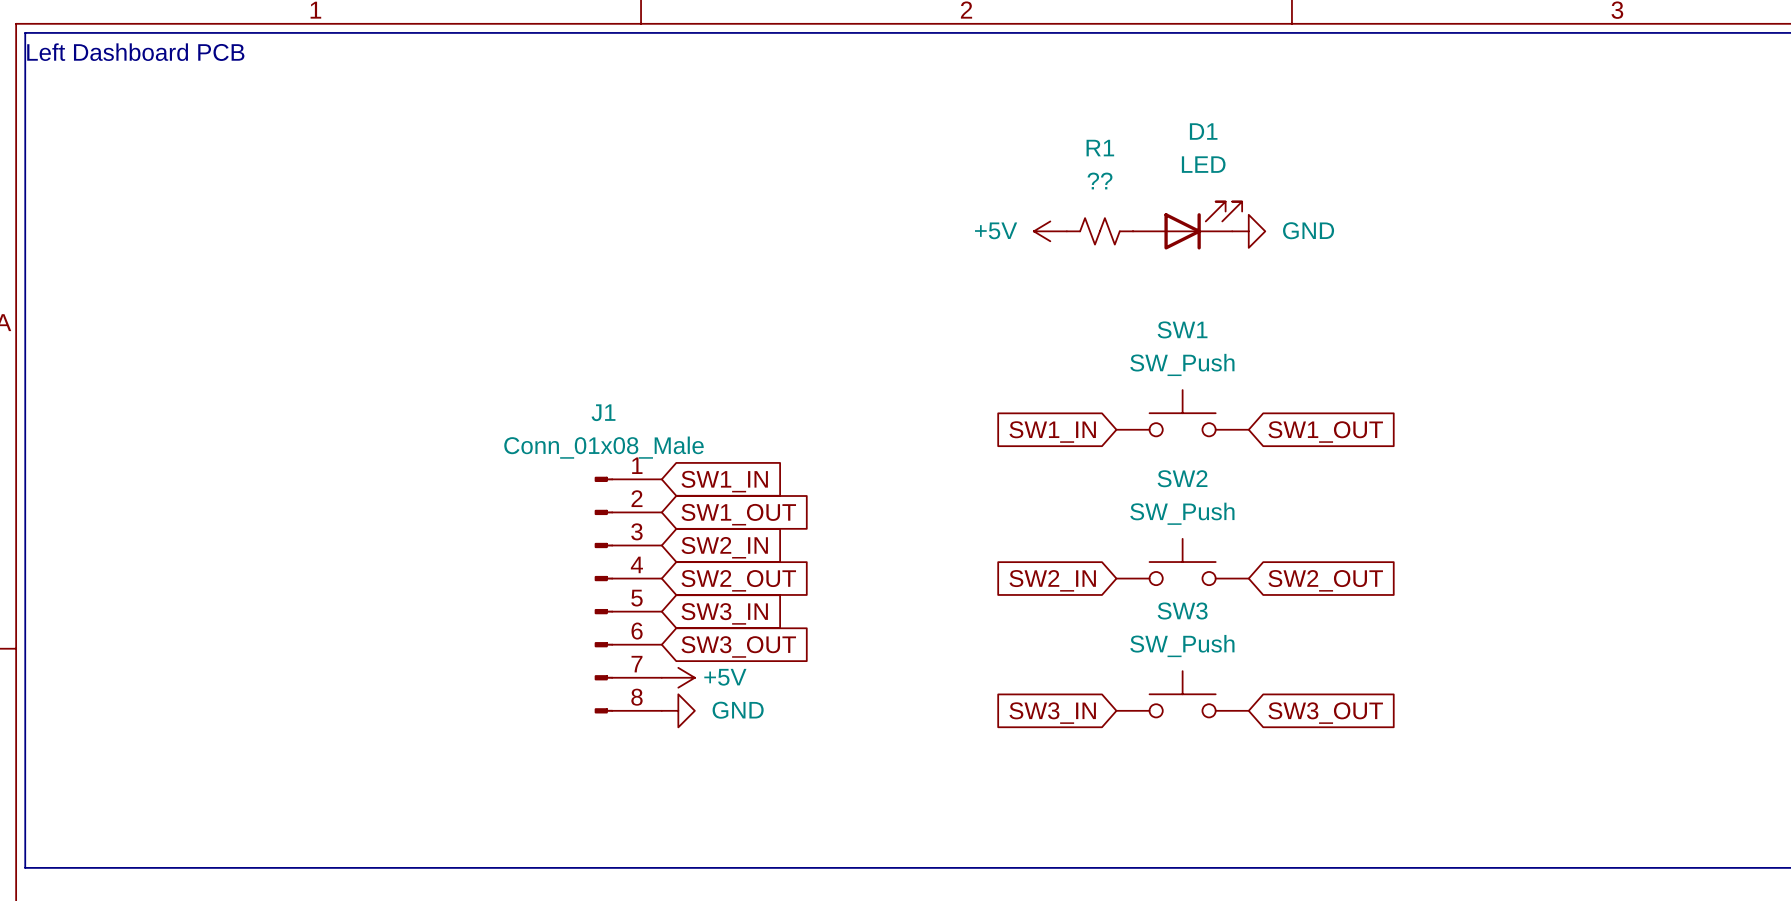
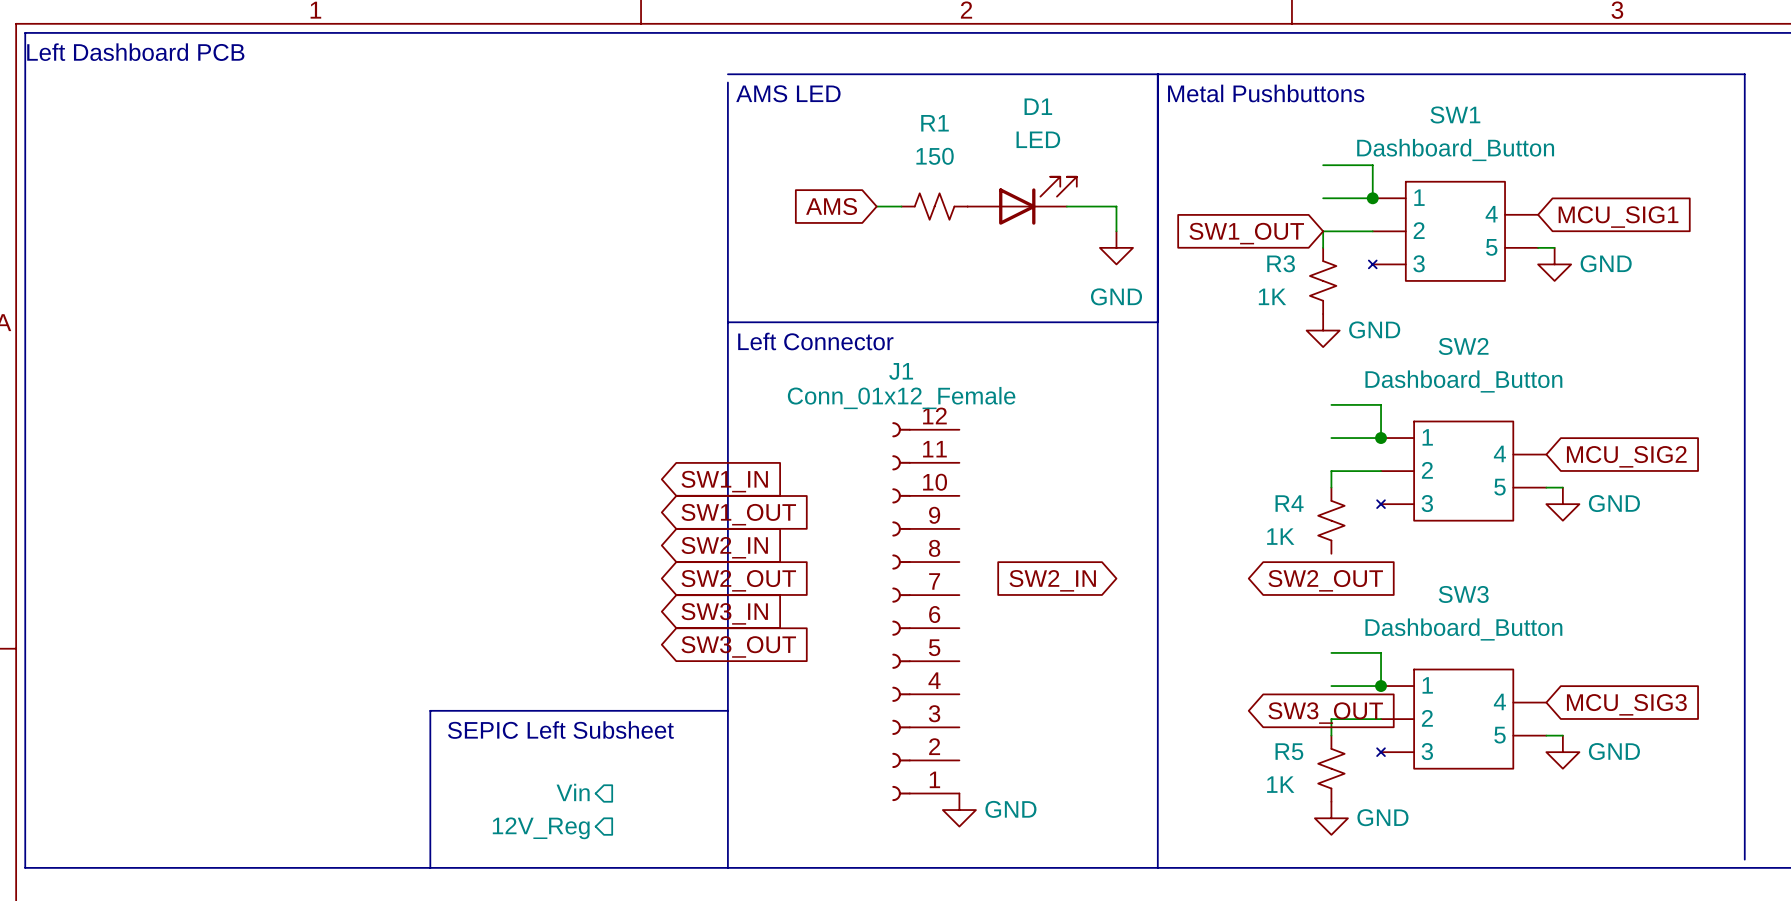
line: none -> (727, 74) (1744, 74) (1744, 859)
line: none -> (1157, 74) (1157, 867)
line: none -> (727, 82) (727, 867)
text: none -> AMS LED (788, 93)
text: none -> Metal Pushbuttons (1266, 93)
wire: none -> (1323, 165) (1372, 165) (1372, 198) (1323, 198)
R1 value: ?? (1099, 181) -> 150 (935, 156)
junction: none -> (1372, 198)
global label: none -> AMS (831, 206)
wire: none -> (876, 206) (901, 206)
wire: none -> (1066, 206) (1116, 206) (1116, 231)
global label: none -> MCU_SIG1 (1618, 217)
D1 position: (1187, 225) -> (1022, 200)
power symbol: +5V (1050, 231) -> none
R1 position: (1099, 231) -> (934, 206)
power symbol: GND (1248, 231) -> none
wire: none -> (1372, 231) (1323, 231) (1323, 247)
power symbol: none -> GND (1116, 247)
wire: none -> (1538, 247) (1554, 247)
power symbol: none -> GND (1554, 264)
R3: none -> 1K (1323, 280)
line: none -> (727, 322) (1157, 322)
SW1 name position: SW1 (1182, 329) -> SW1 (1455, 114)
power symbol: none -> GND (1323, 330)
text: none -> Left Connector (815, 341)
SW1 value: SW_Push (1182, 364) -> Dashboard_Button (1455, 150)
SW1 symbol: [1116, 390, 1249, 437] -> [1368, 181, 1539, 281]
wire: none -> (1331, 404) (1381, 404) (1381, 438) (1331, 438)
J1 name position: J1 (603, 412) -> J1 (901, 371)
global label: SW1_IN (1052, 432) -> none
global label rotation: 0° (1325, 432) -> 180° (1246, 233)
global label position: SW1_OUT (1325, 432) -> SW1_OUT (1246, 233)
junction: none -> (1381, 438)
J1 value: Conn_01x08_Male (604, 447) -> Conn_01x12_Female (901, 398)
global label: none -> MCU_SIG2 (1626, 456)
wire: none -> (1381, 471) (1331, 471) (1331, 487)
J1 symbol: [594, 476, 662, 714] -> [892, 422, 960, 802]
SW2 name position: SW2 (1182, 478) -> SW2 (1463, 346)
wire: none -> (1546, 487) (1562, 487)
power symbol: none -> GND (1562, 504)
SW2 value: SW_Push (1182, 513) -> Dashboard_Button (1463, 381)
R4: none -> 1K (1331, 520)
SW2 symbol: [1116, 538, 1249, 586] -> [1377, 421, 1547, 521]
SW3 name position: SW3 (1182, 611) -> SW3 (1463, 594)
SW3 value: SW_Push (1182, 646) -> Dashboard_Button (1463, 629)
wire: none -> (1331, 652) (1381, 652) (1381, 686) (1331, 686)
SW3 symbol: [1116, 671, 1249, 718] -> [1377, 669, 1547, 769]
power symbol: +5V (678, 677) -> none
junction: none -> (1381, 686)
global label: none -> MCU_SIG3 (1626, 704)
power symbol rotation: 0° (678, 710) -> 90° clockwise (959, 810)
power symbol position: GND (678, 710) -> GND (959, 810)
line: none -> (727, 710) (430, 710) (430, 867)
global label: SW3_IN (1052, 713) -> none
wire: none -> (1381, 719) (1331, 719) (1331, 735)
text: none -> SEPIC Left Subsheet (560, 730)
wire: none -> (1546, 735) (1562, 735)
power symbol: none -> GND (1562, 752)
R5: none -> 1K (1331, 768)
sheet pin: none -> Vin (573, 792)
power symbol: none -> GND (1331, 818)
sheet pin: none -> 12V_Reg (541, 828)

